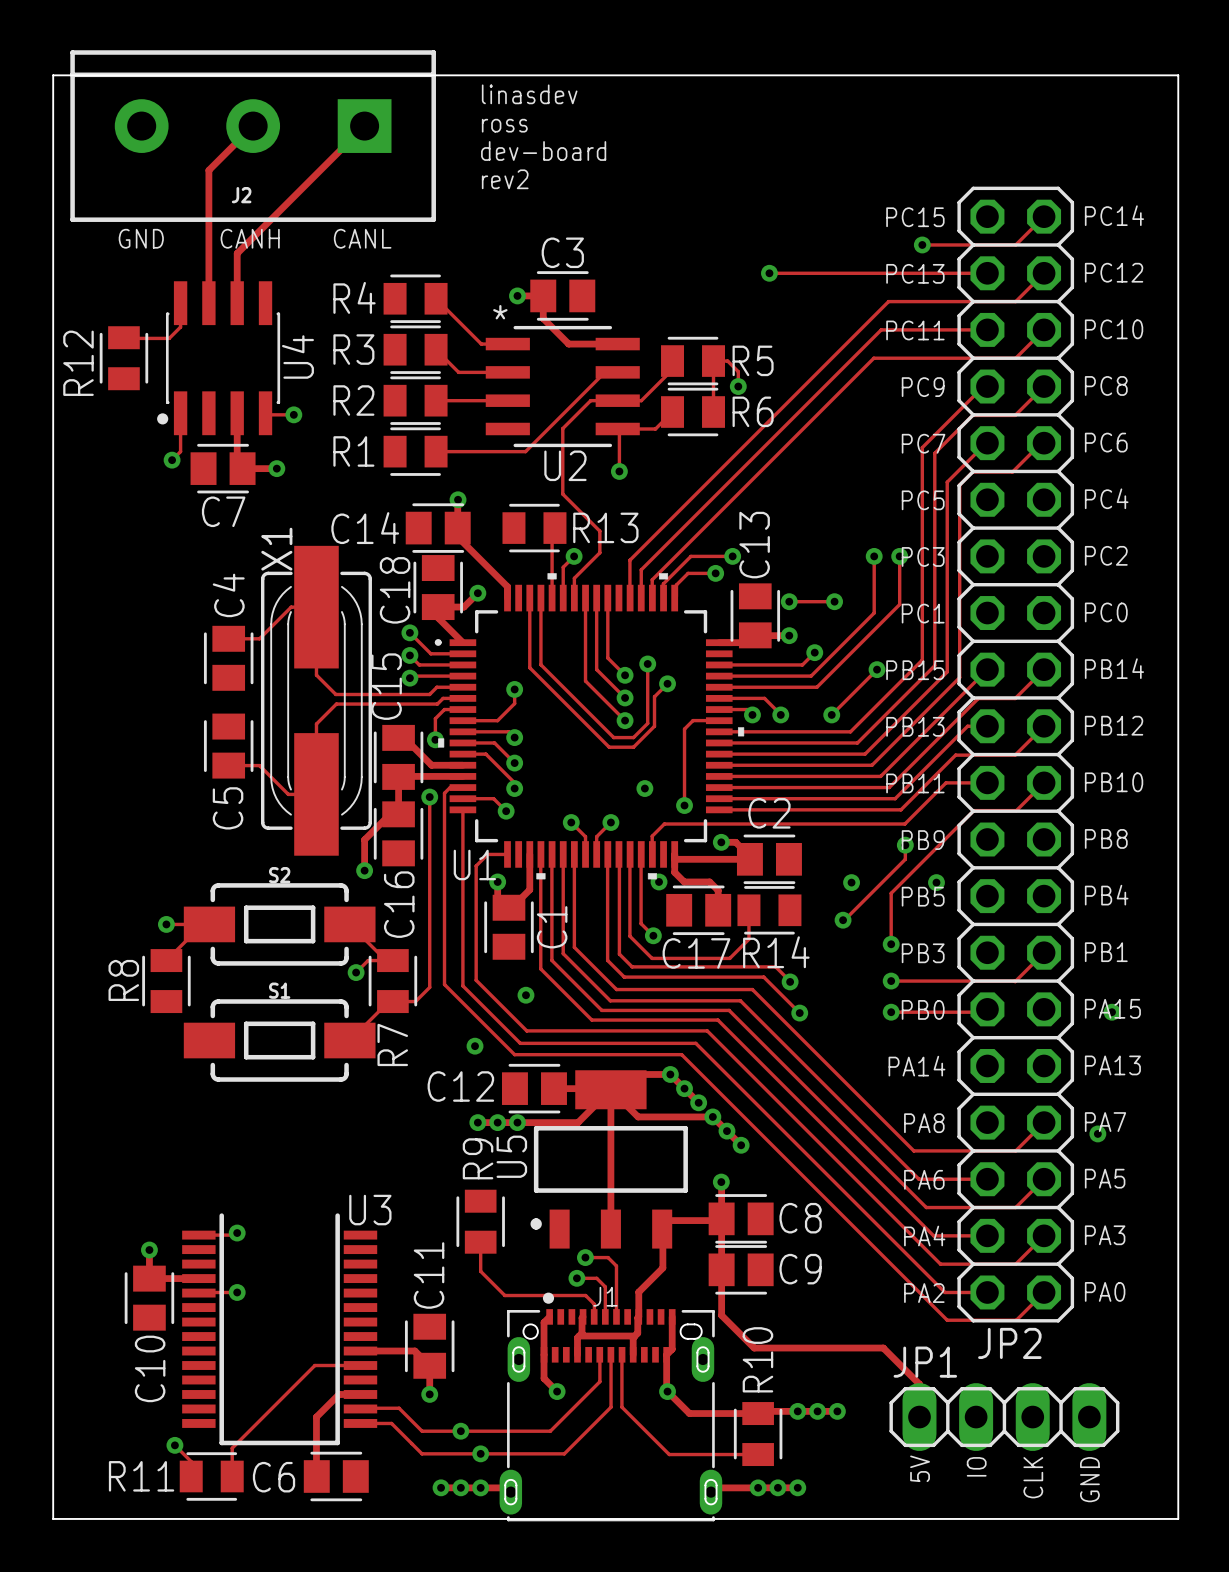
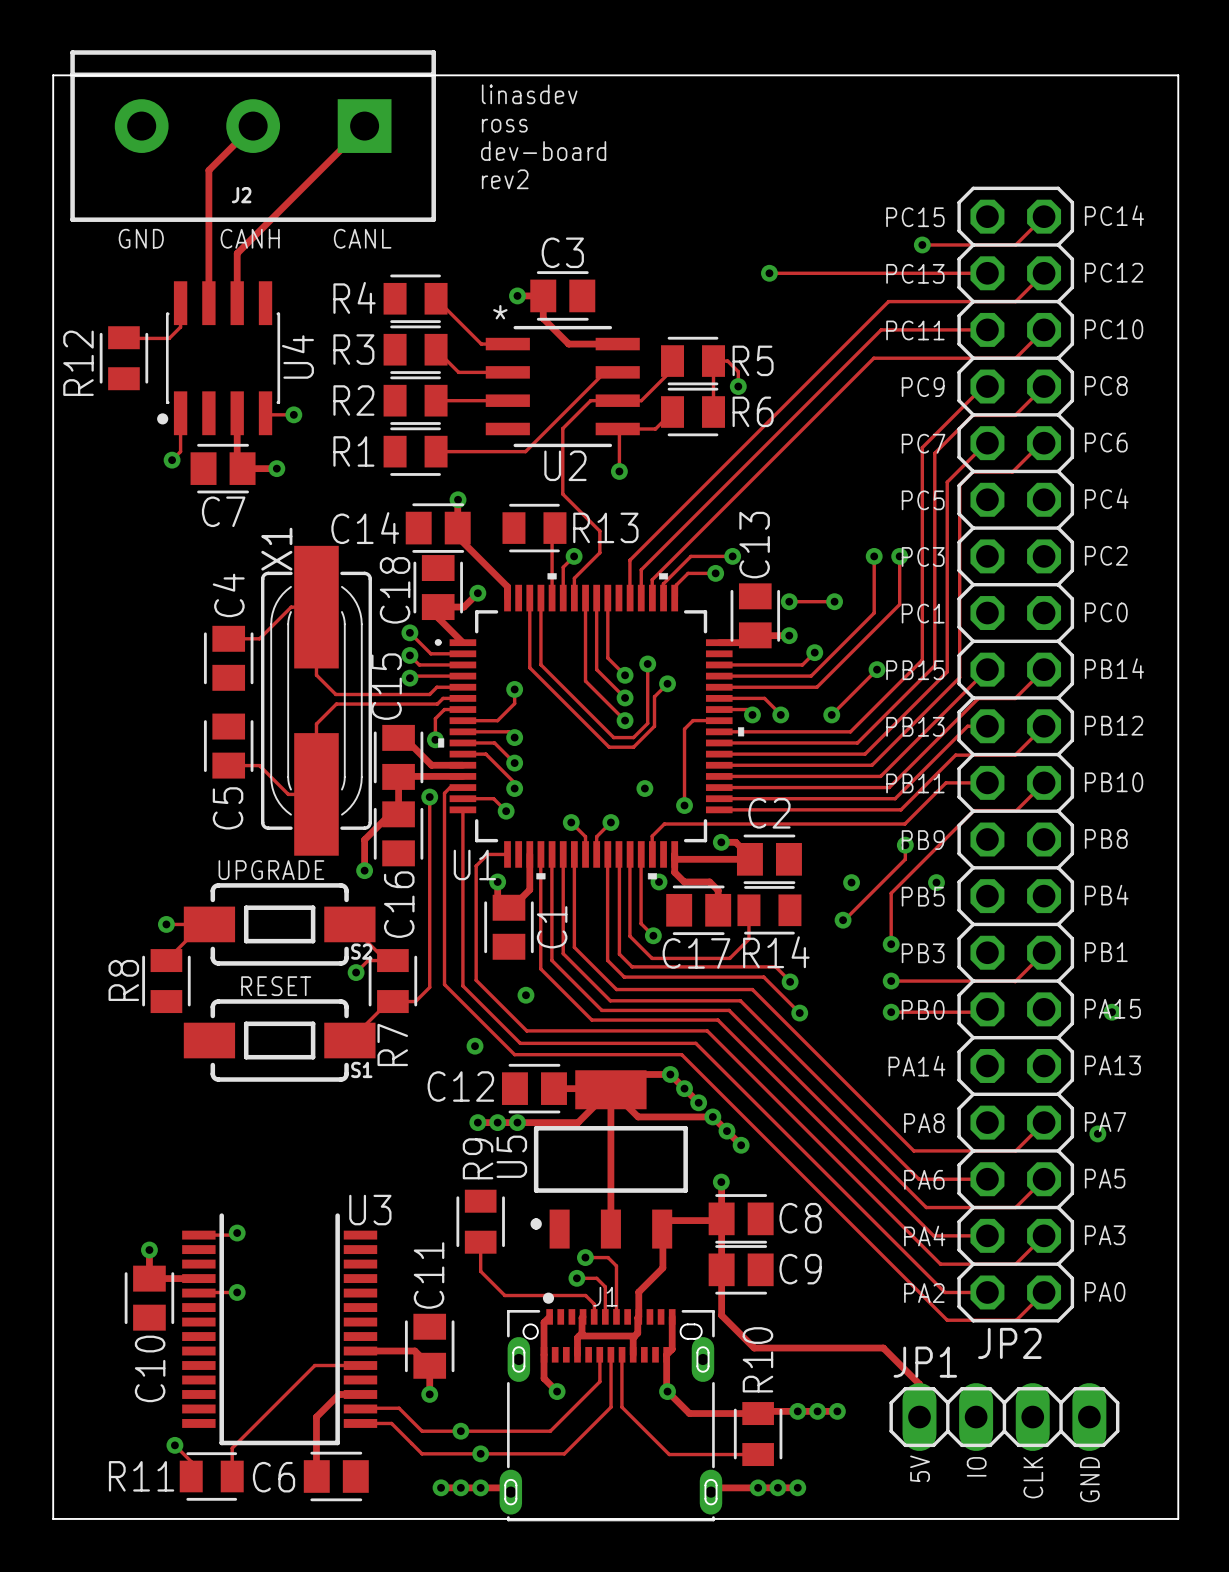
text: none -> UPGRADE (271, 870)
S2 name position: S2 (279, 875) -> S2 (361, 951)
text: none -> RESET (276, 986)
S1 name position: S1 (279, 990) -> S1 (361, 1069)

